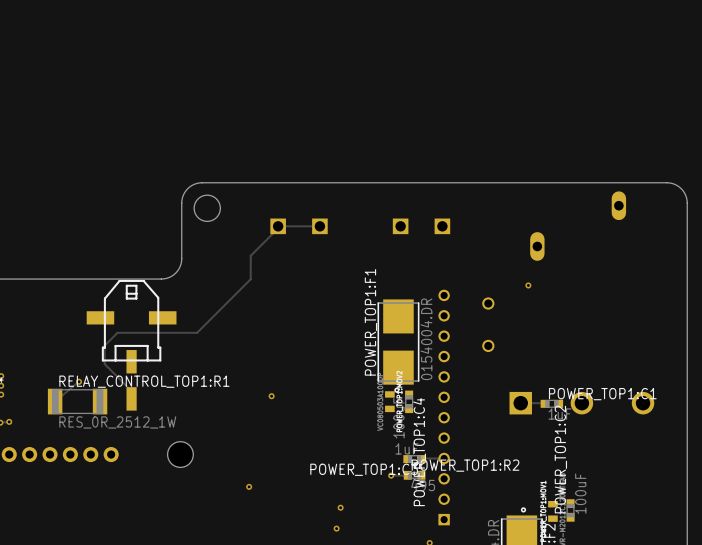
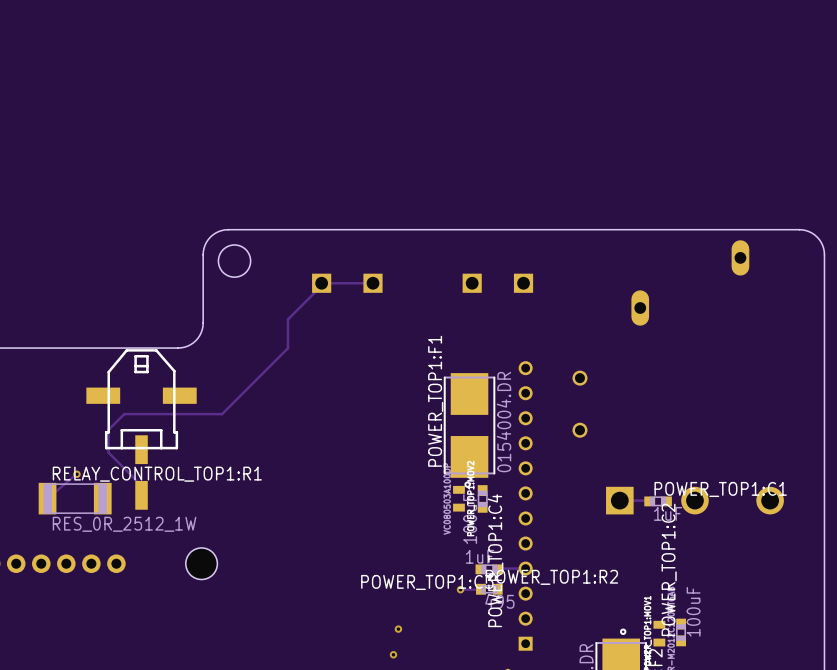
via: (528, 285) -> none
via: (271, 396) -> none
via: (249, 486) -> none

